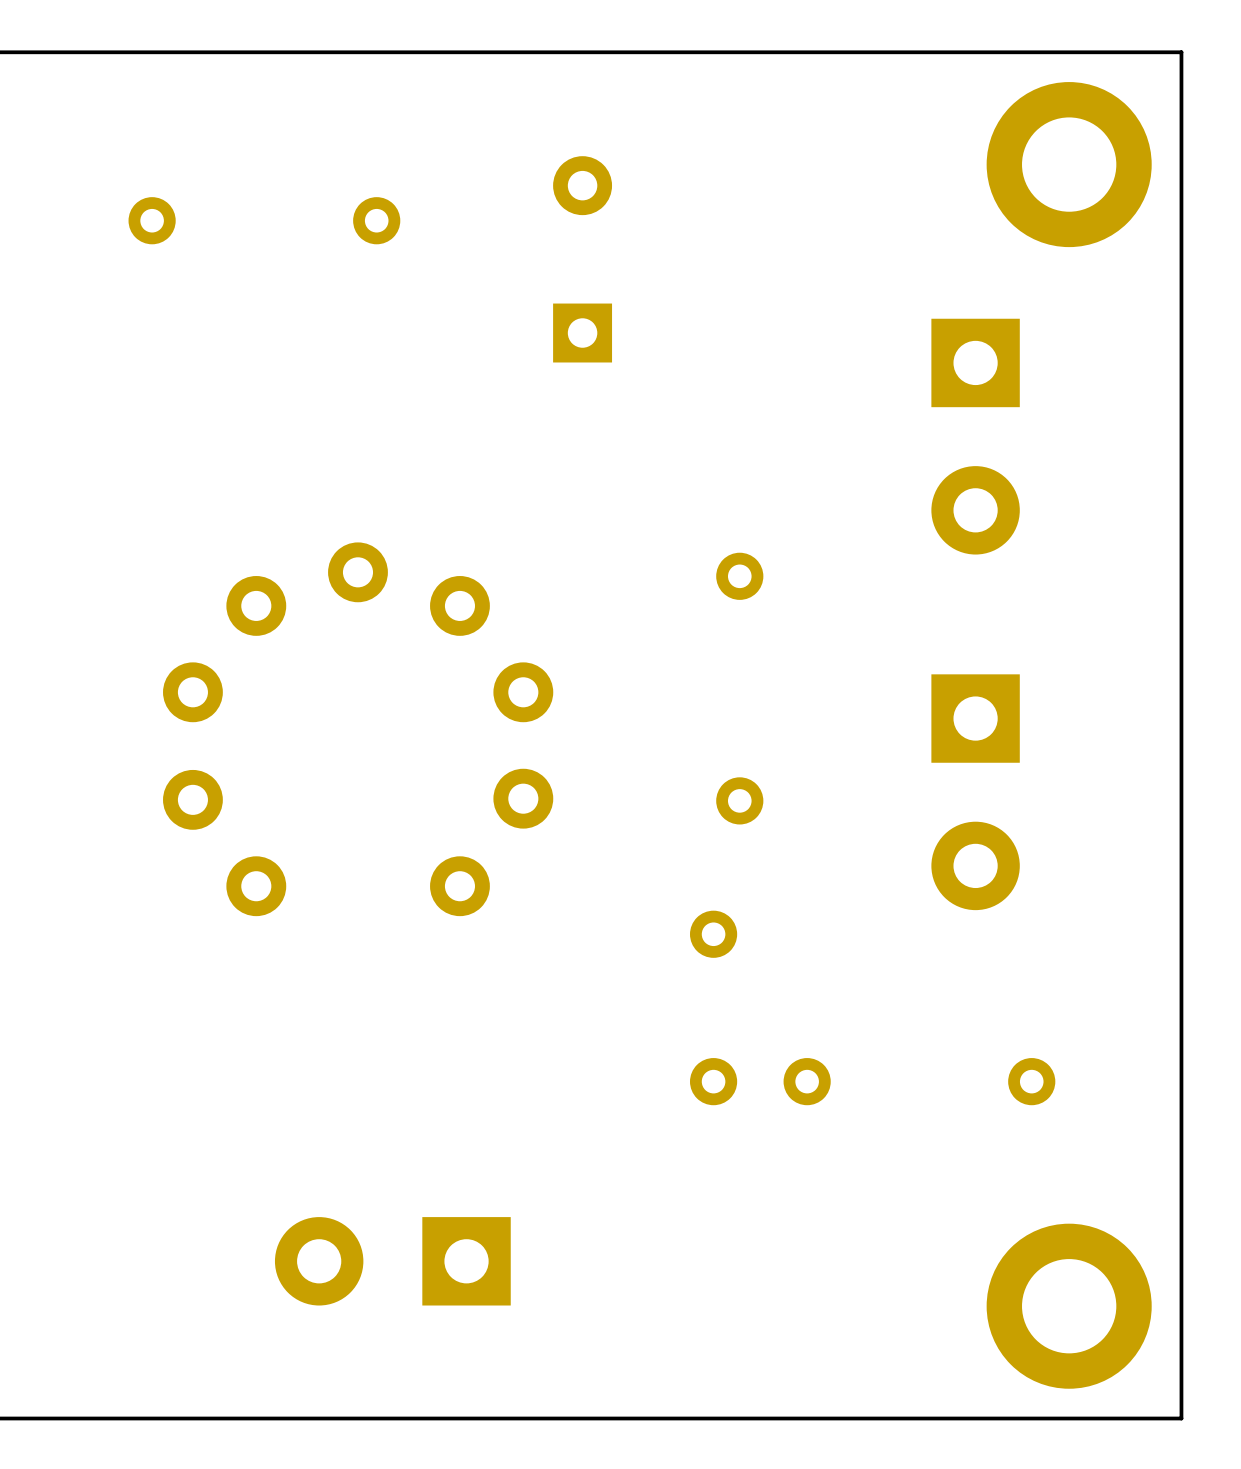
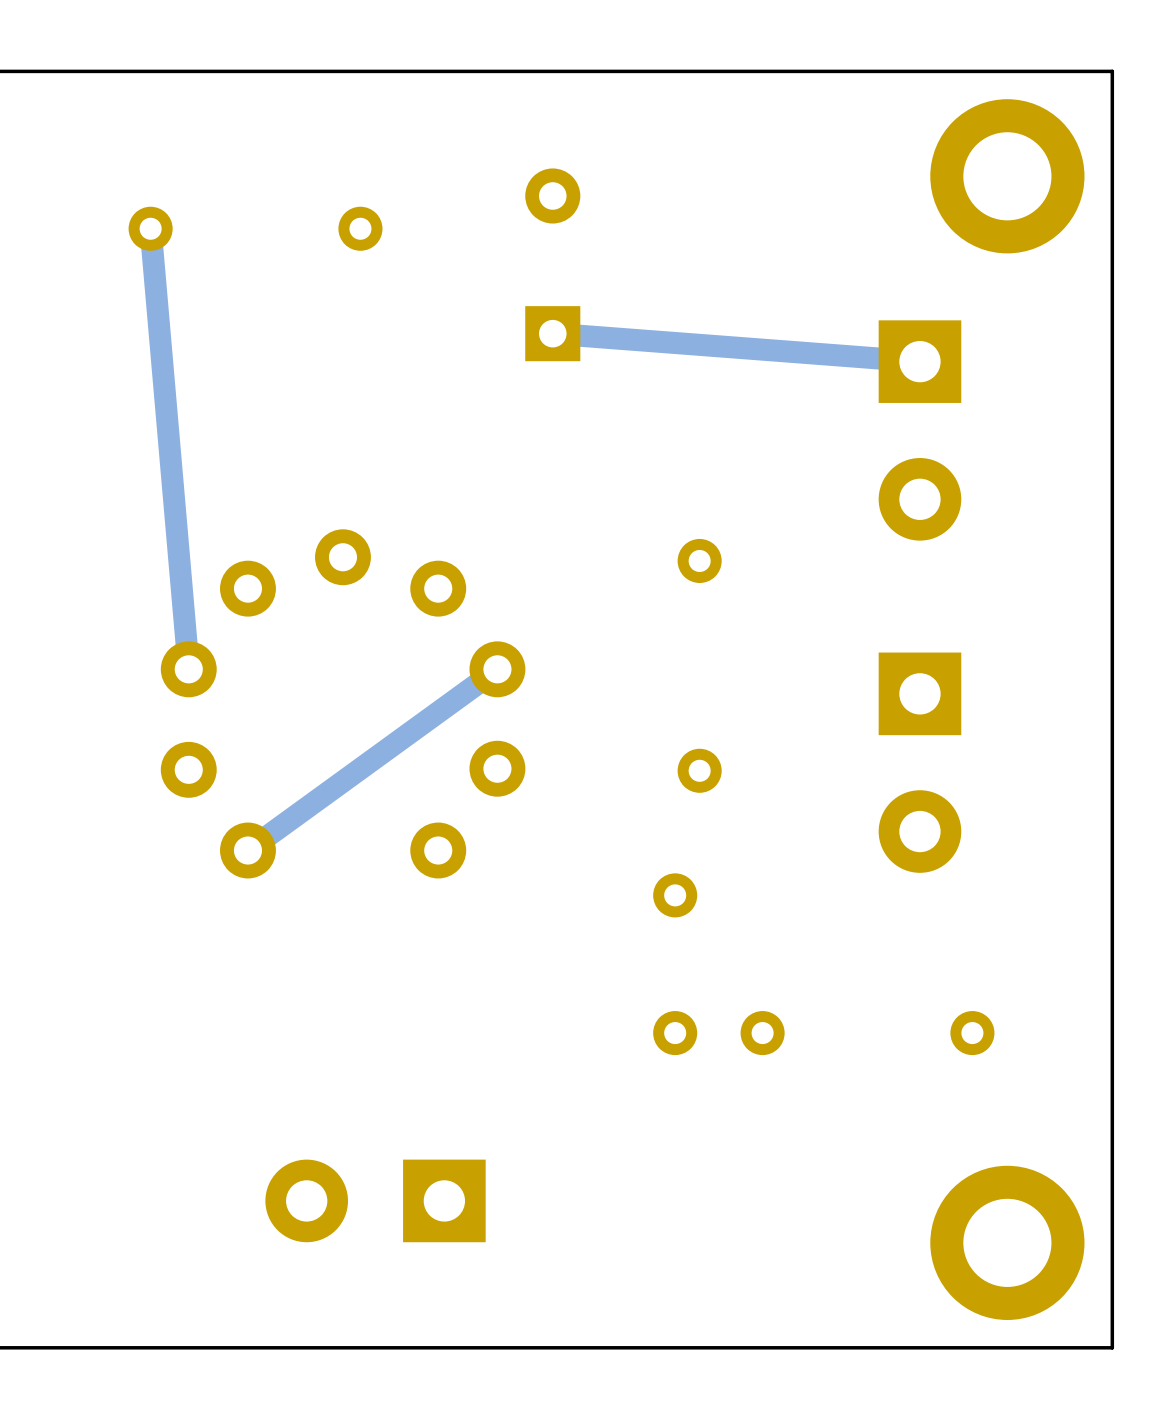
track: none -> (150, 228) (188, 669)
track: none -> (552, 333) (919, 361)
track: none -> (497, 669) (247, 850)

